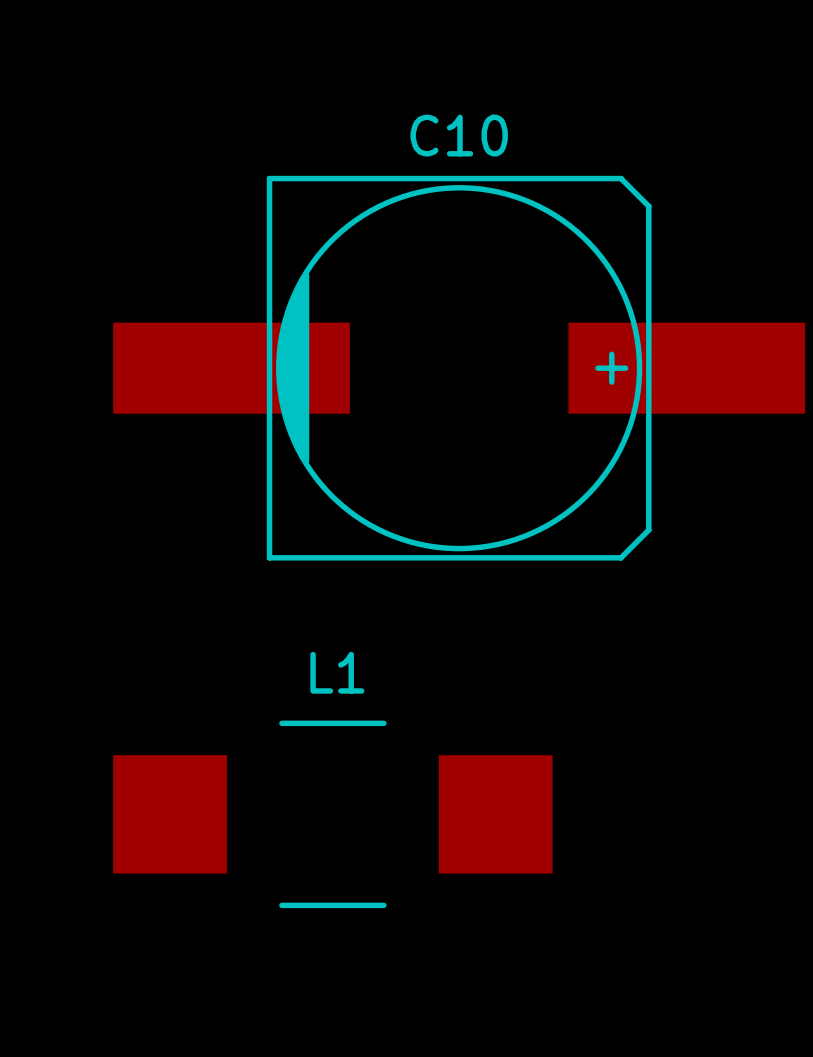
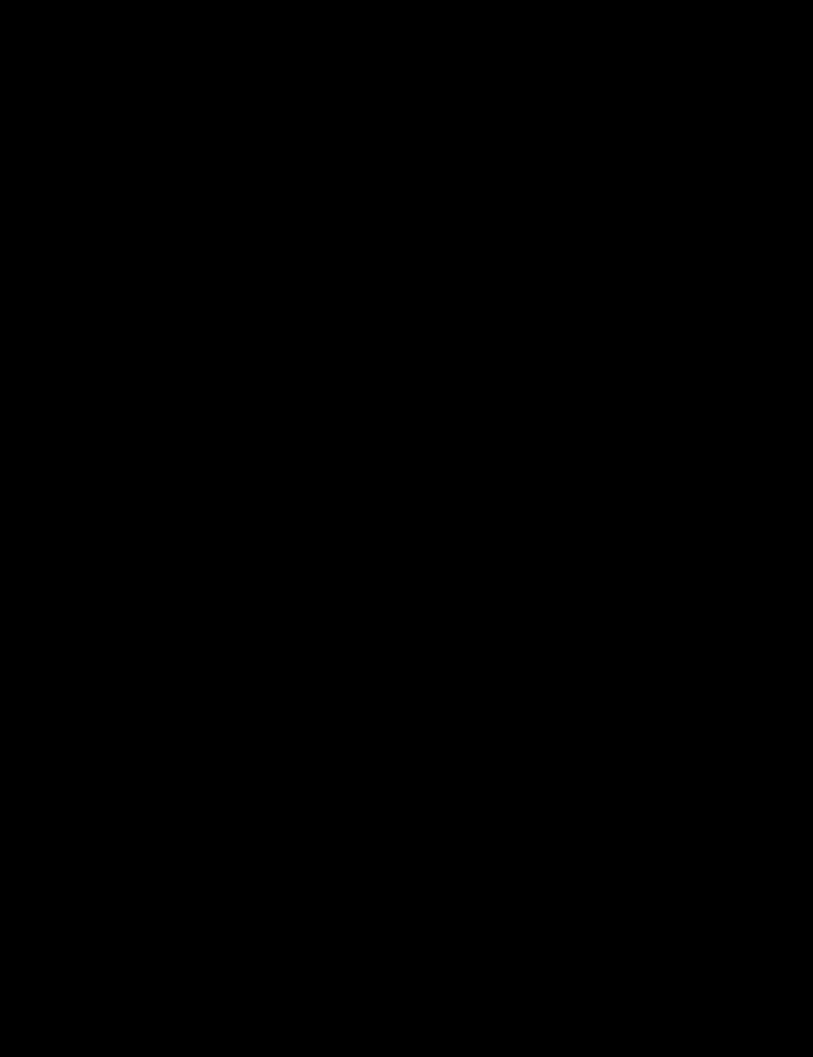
C10: (459, 368) -> none
L1: (332, 814) -> none

